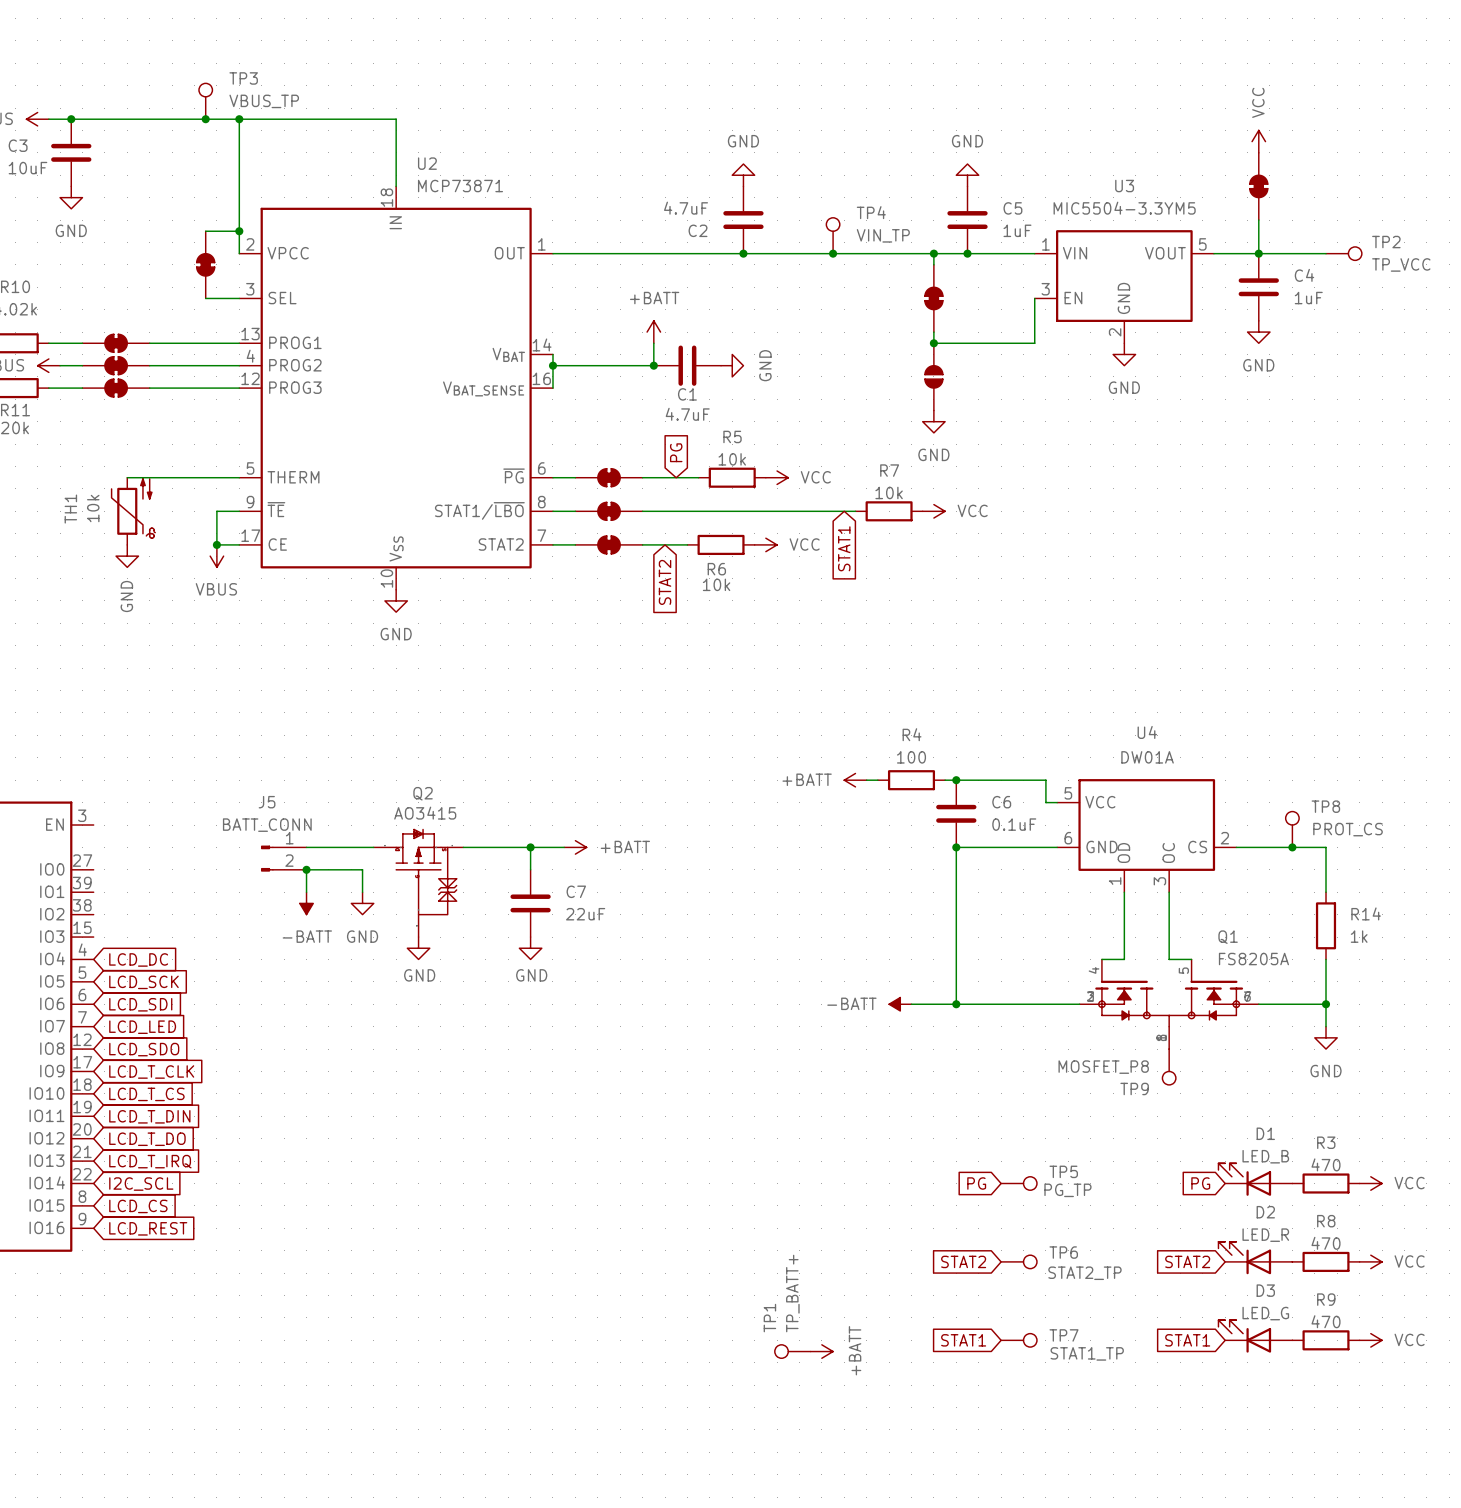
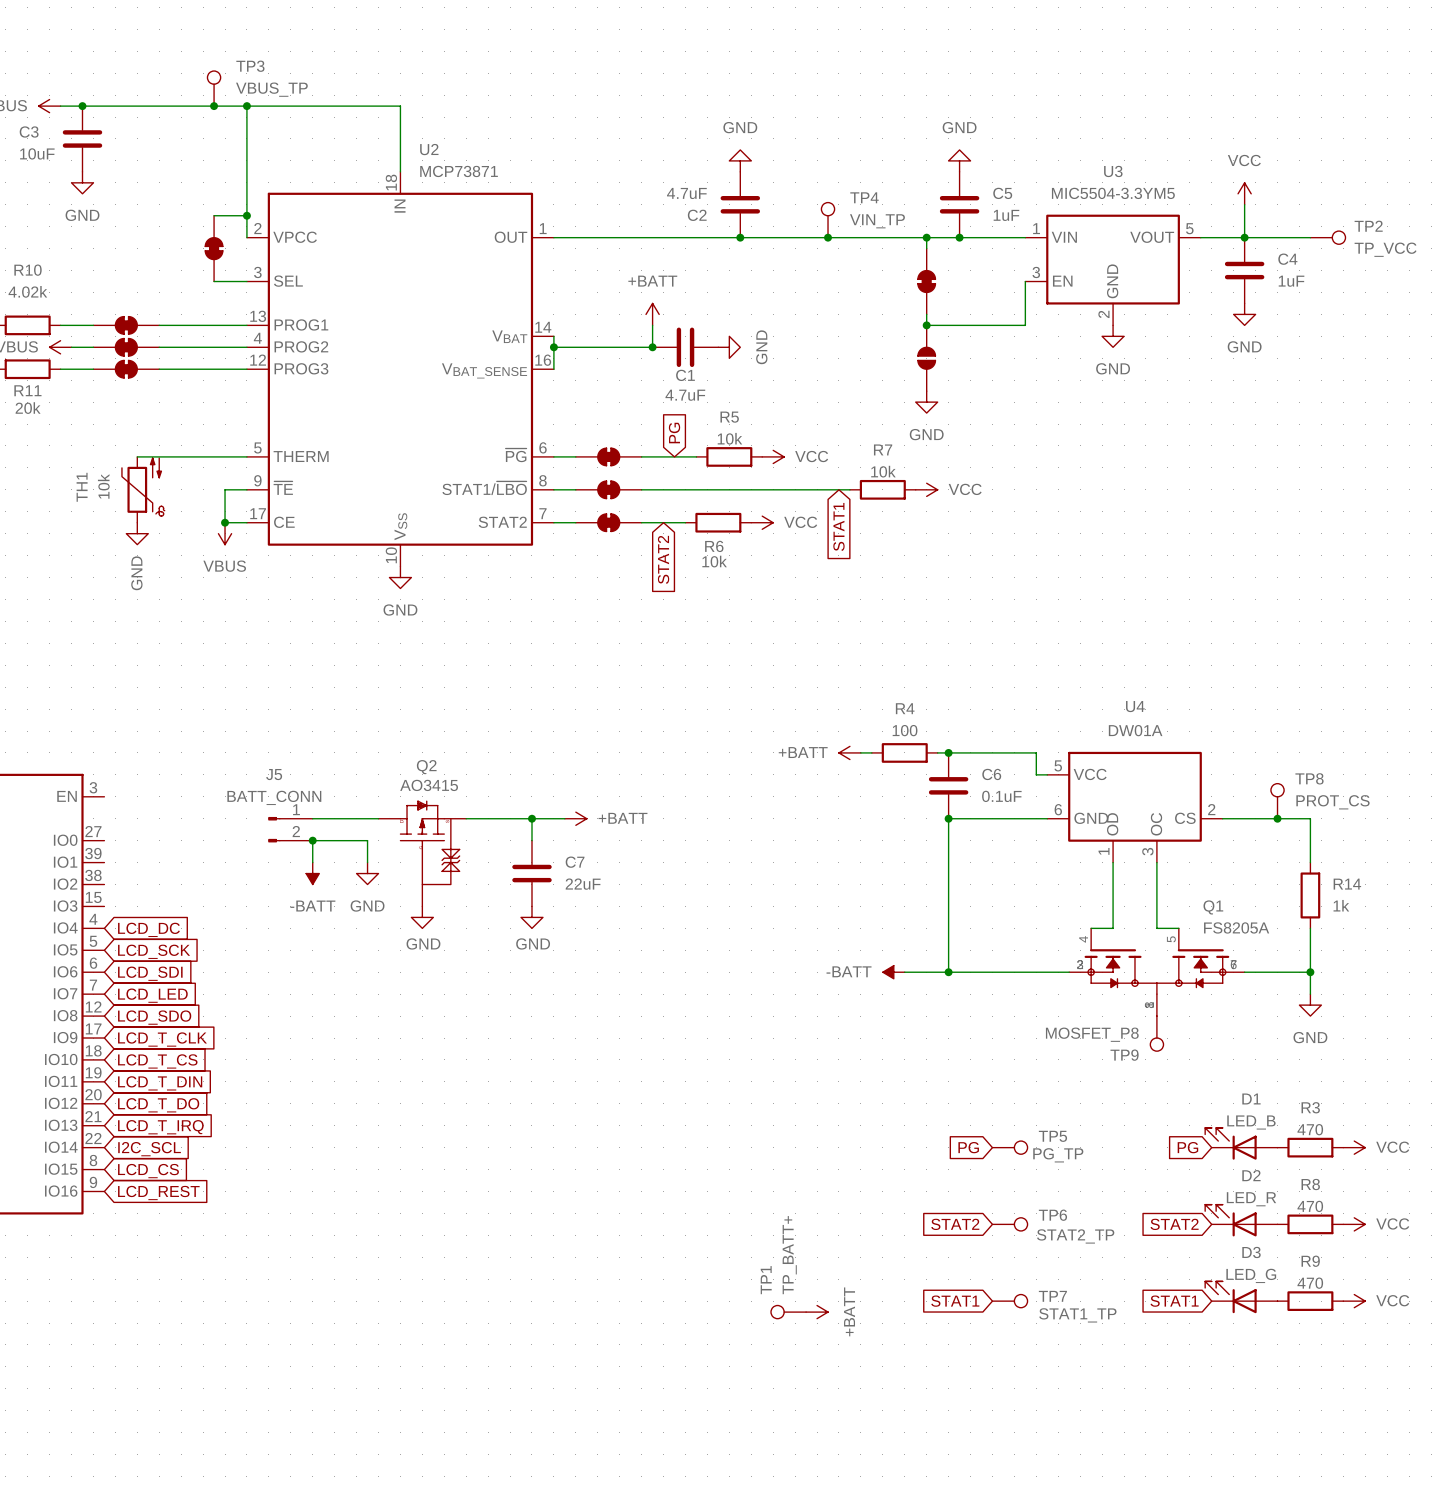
power symbol text rotation: 0° (1258, 102) -> 90° clockwise (1244, 160)
power symbol position: VCC (1258, 141) -> VCC (1244, 193)
part: (1258, 186) -> none

